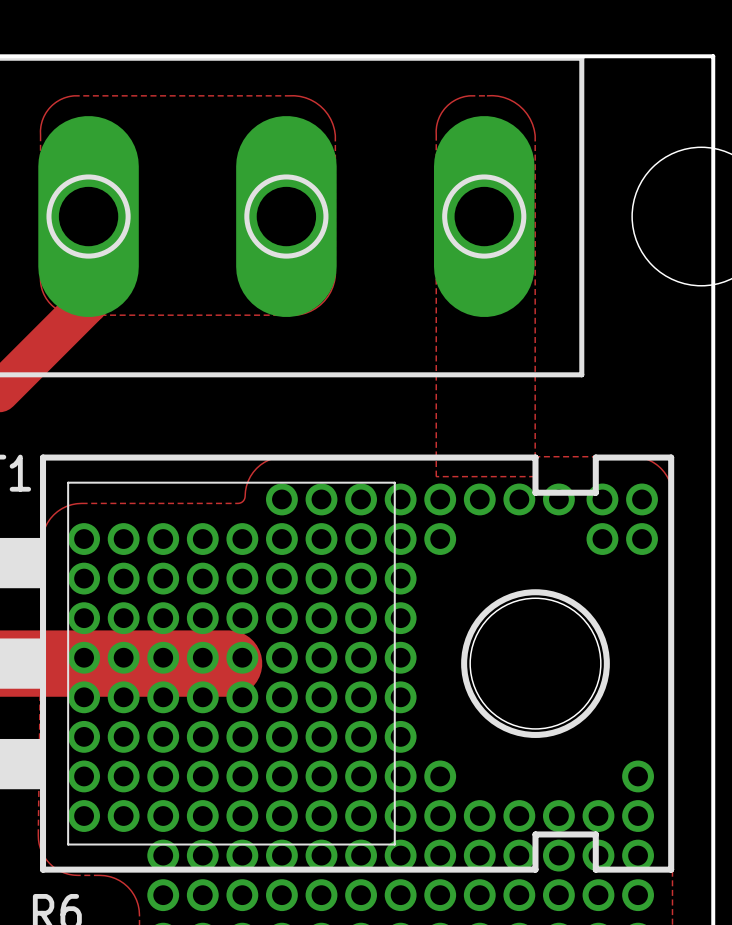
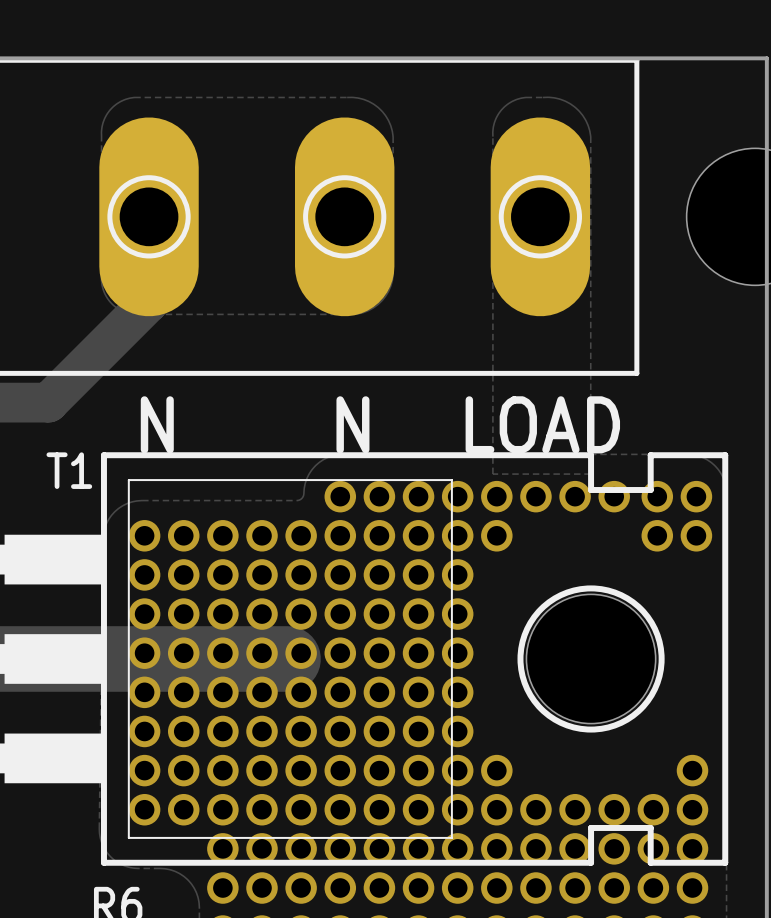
text: none -> N (157, 424)
text: none -> N (352, 424)
text: none -> LOAD (542, 424)

